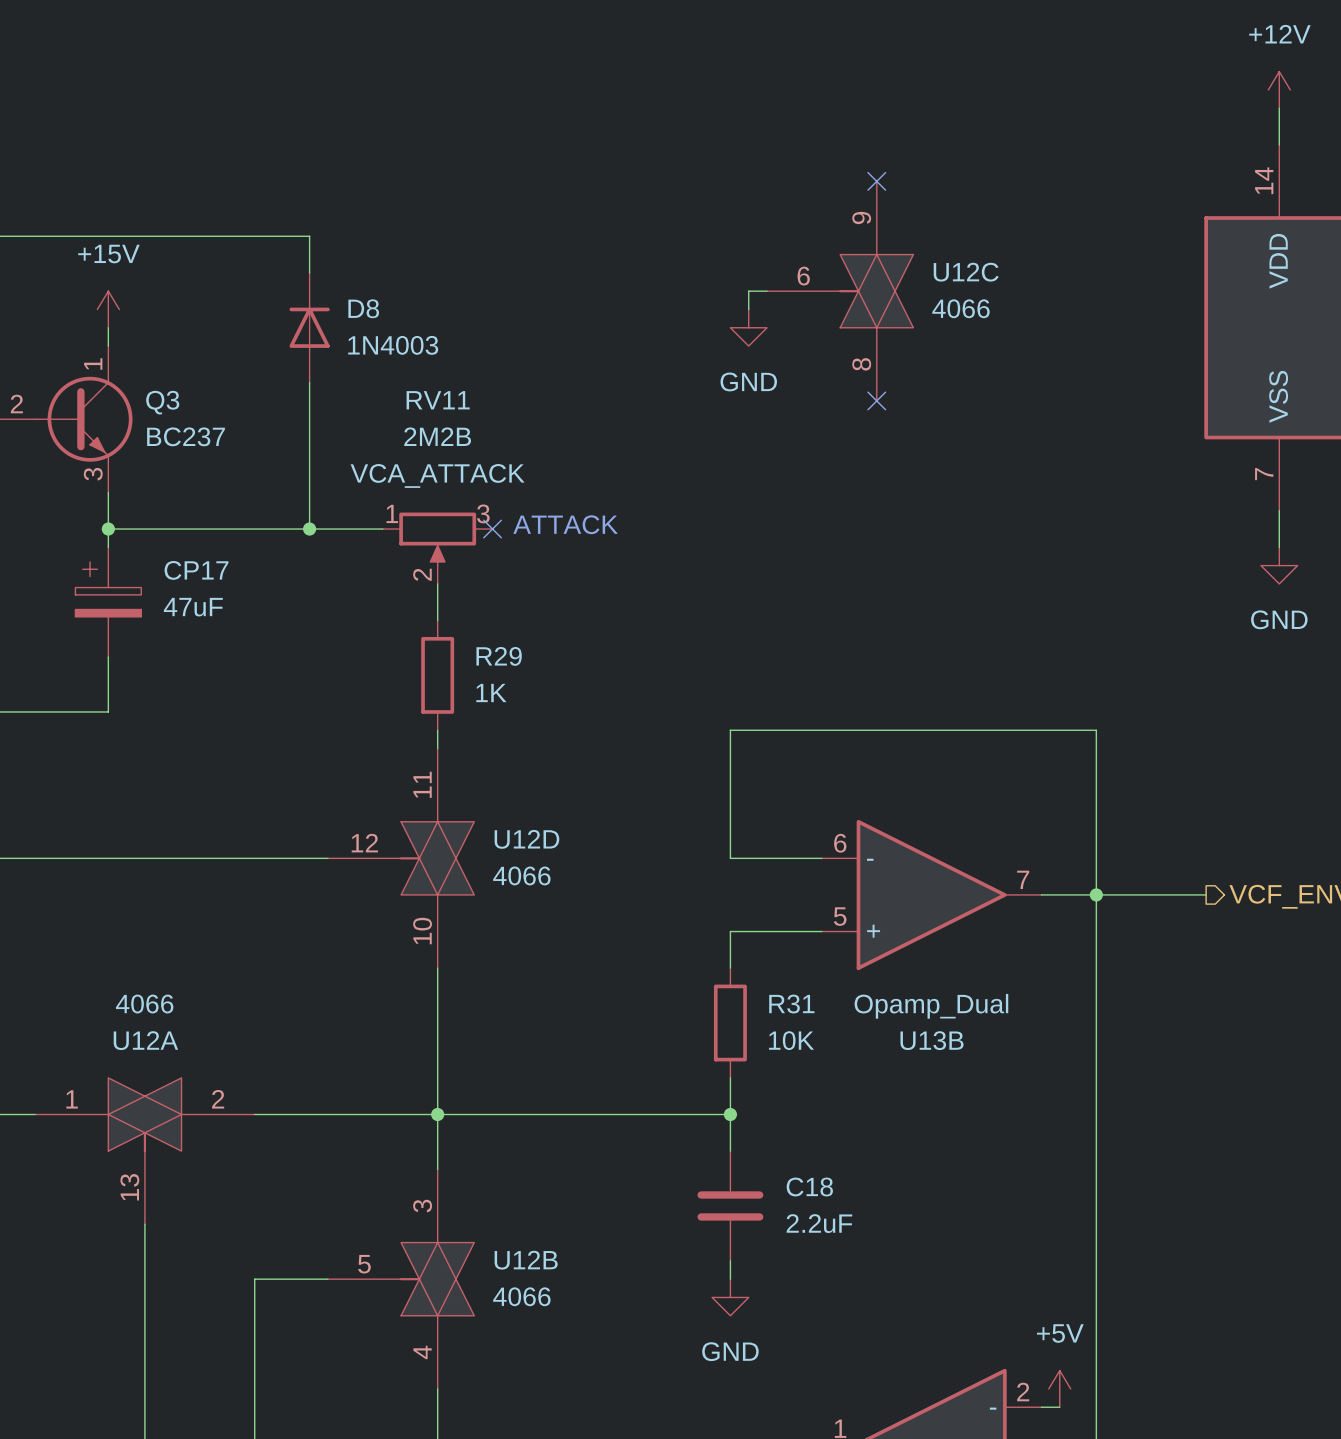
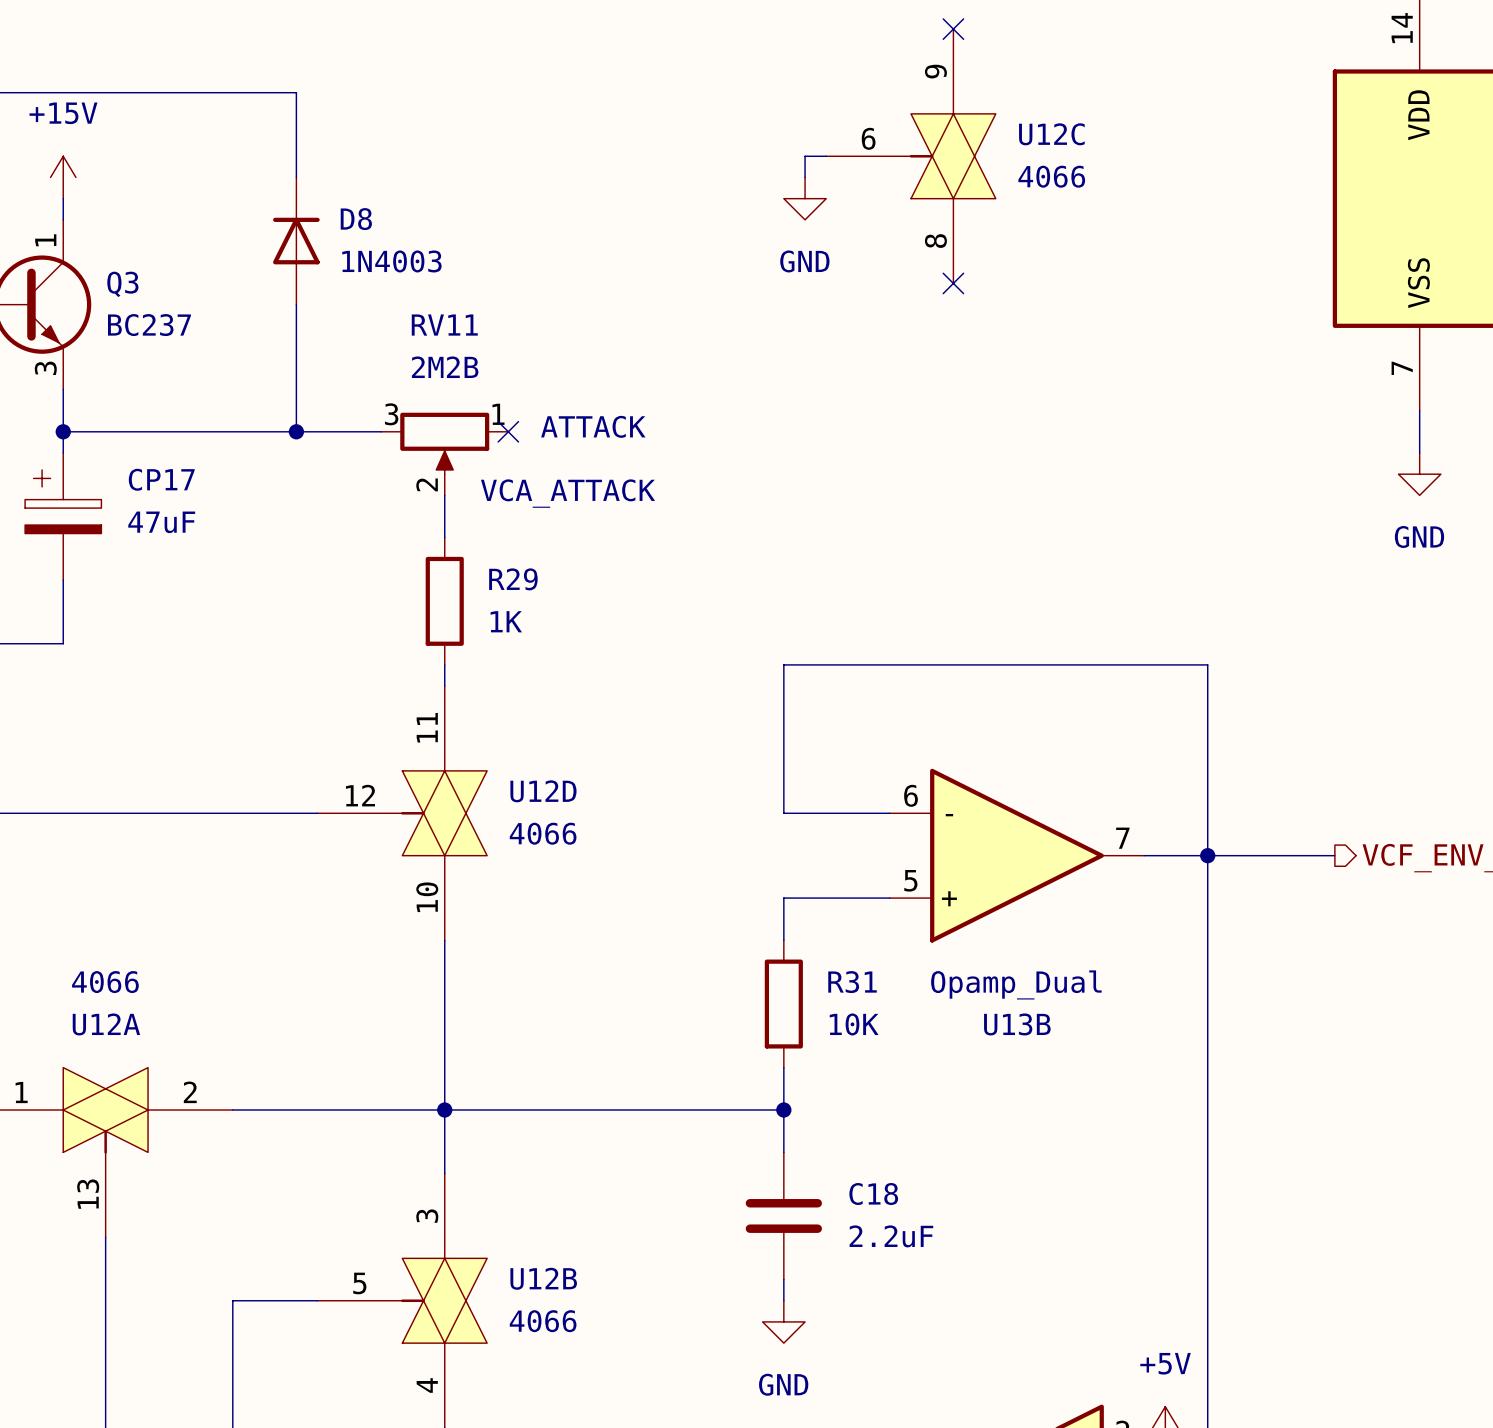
D8 position: (309, 327) -> (296, 241)
RV11 name position: RV11 (438, 400) -> RV11 (444, 325)
RV11 value position: 2M2B (437, 436) -> 2M2B (445, 367)
RV11 text position: VCA_ATTACK (437, 475) -> VCA_ATTACK (568, 493)
RV11 flip: as is (437, 539) -> left-right (444, 443)

